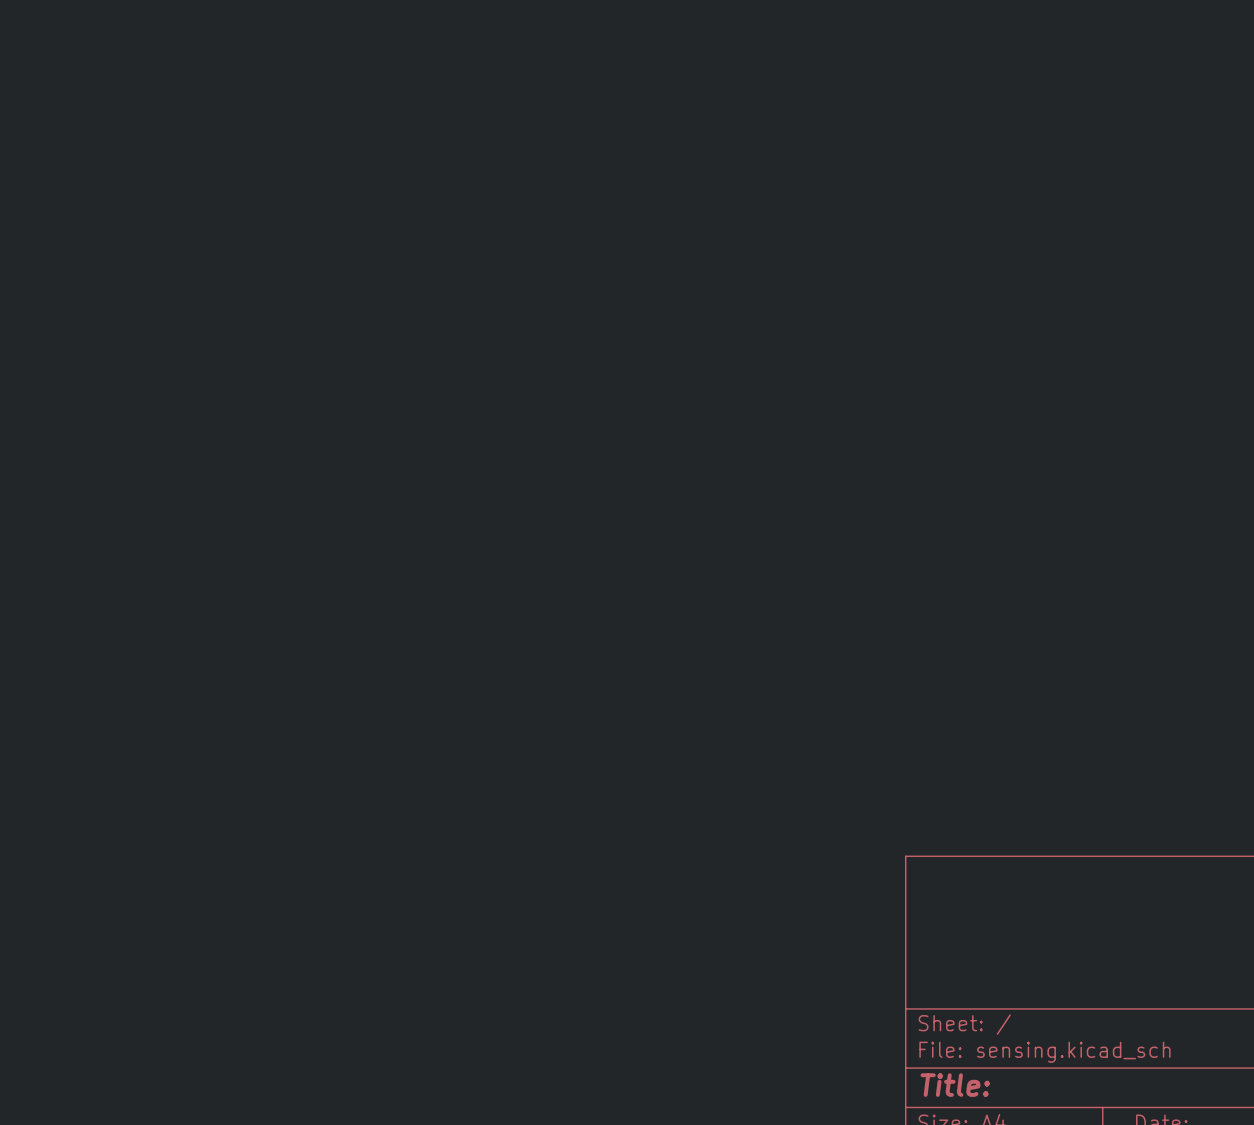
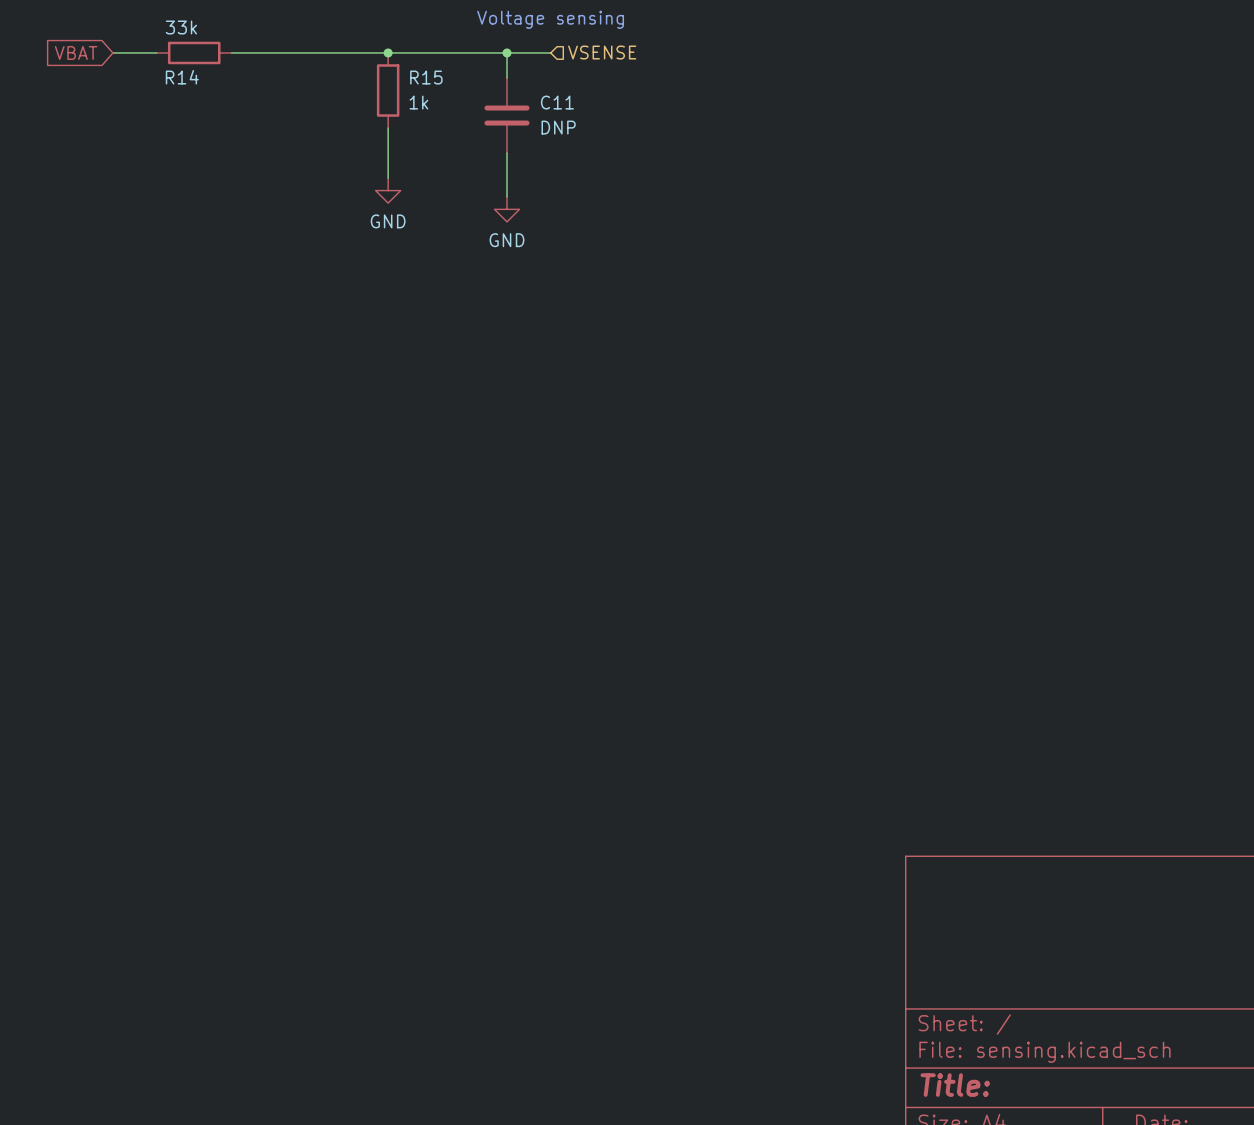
text: none -> Voltage sensing (550, 19)
global label: none -> VBAT (76, 52)
wire: none -> (112, 52) (156, 52)
R14: none -> 33k (194, 52)
wire: none -> (231, 52) (550, 52)
junction: none -> (388, 52)
wire: none -> (507, 52) (507, 78)
junction: none -> (507, 52)
hierarchical label: none -> VSENSE (602, 52)
R15: none -> 1k (388, 90)
C11: none -> DNP (507, 115)
wire: none -> (388, 128) (388, 178)
wire: none -> (507, 153) (507, 196)
power symbol: none -> GND (388, 190)
power symbol: none -> GND (507, 209)

